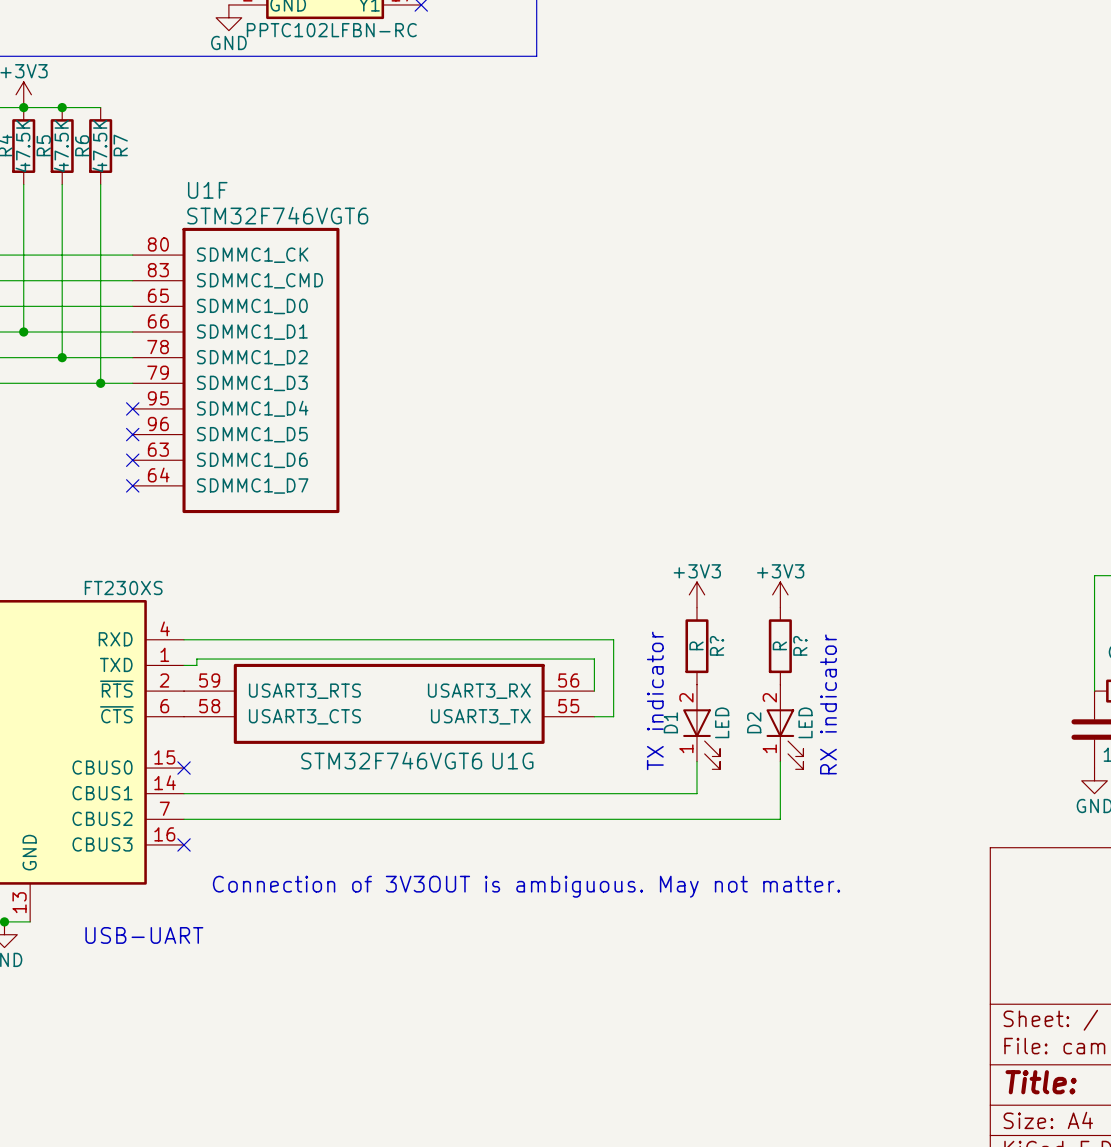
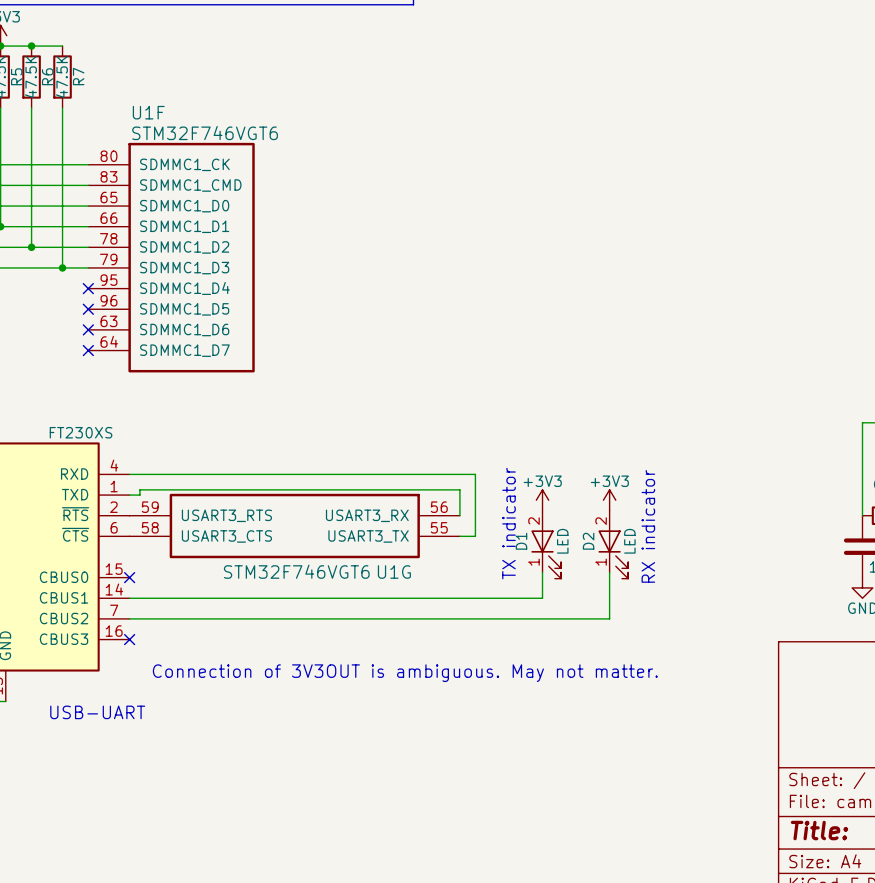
power symbol: +3V3 (696, 594) -> none
power symbol: +3V3 (780, 594) -> none
R?: R (696, 646) -> none
R?: R (780, 646) -> none
power symbol: none -> +3V3 (542, 500)
power symbol: none -> +3V3 (609, 500)

